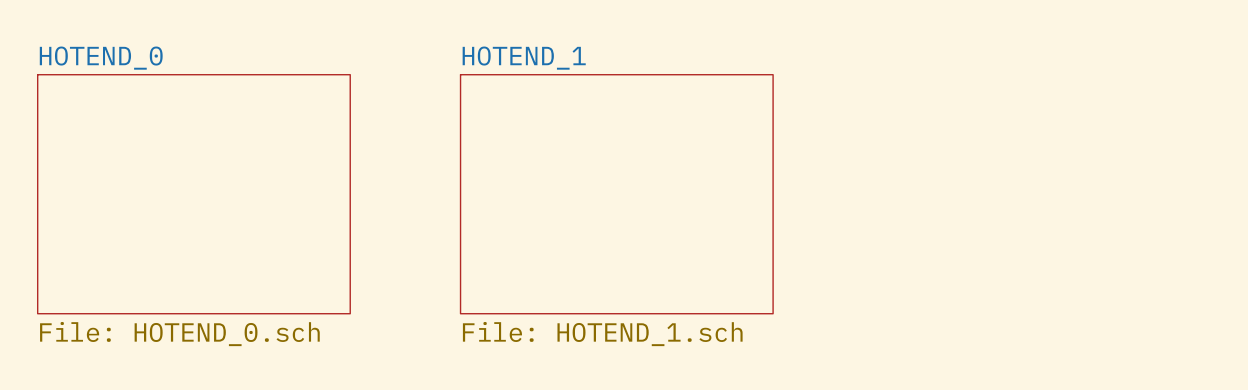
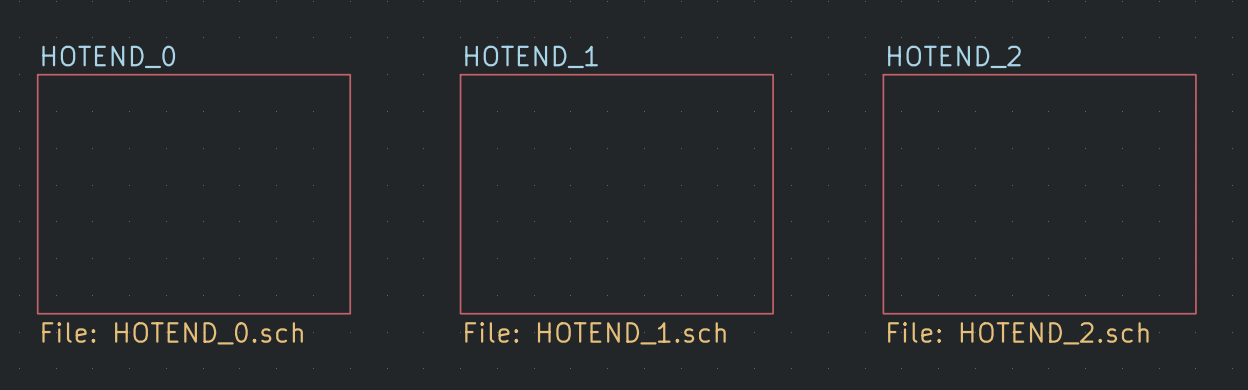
sheet HOTEND_2: none -> File: HOTEND_2.sch (1039, 194)

